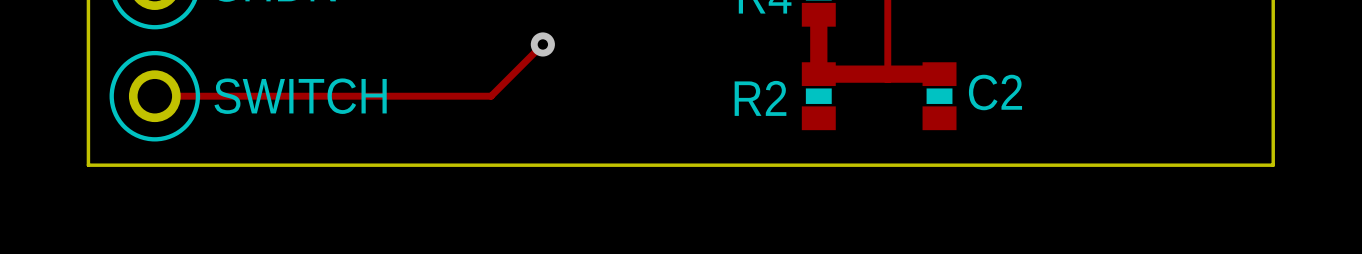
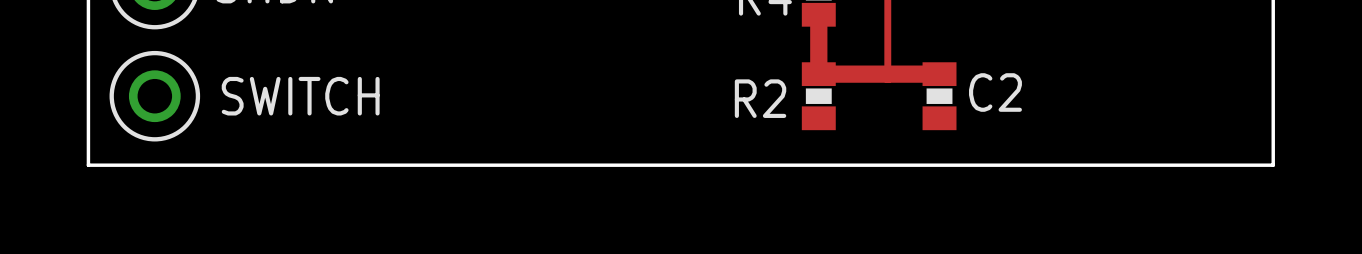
track: (542, 44) (491, 96) (154, 96) -> none
via: (542, 44) -> none

